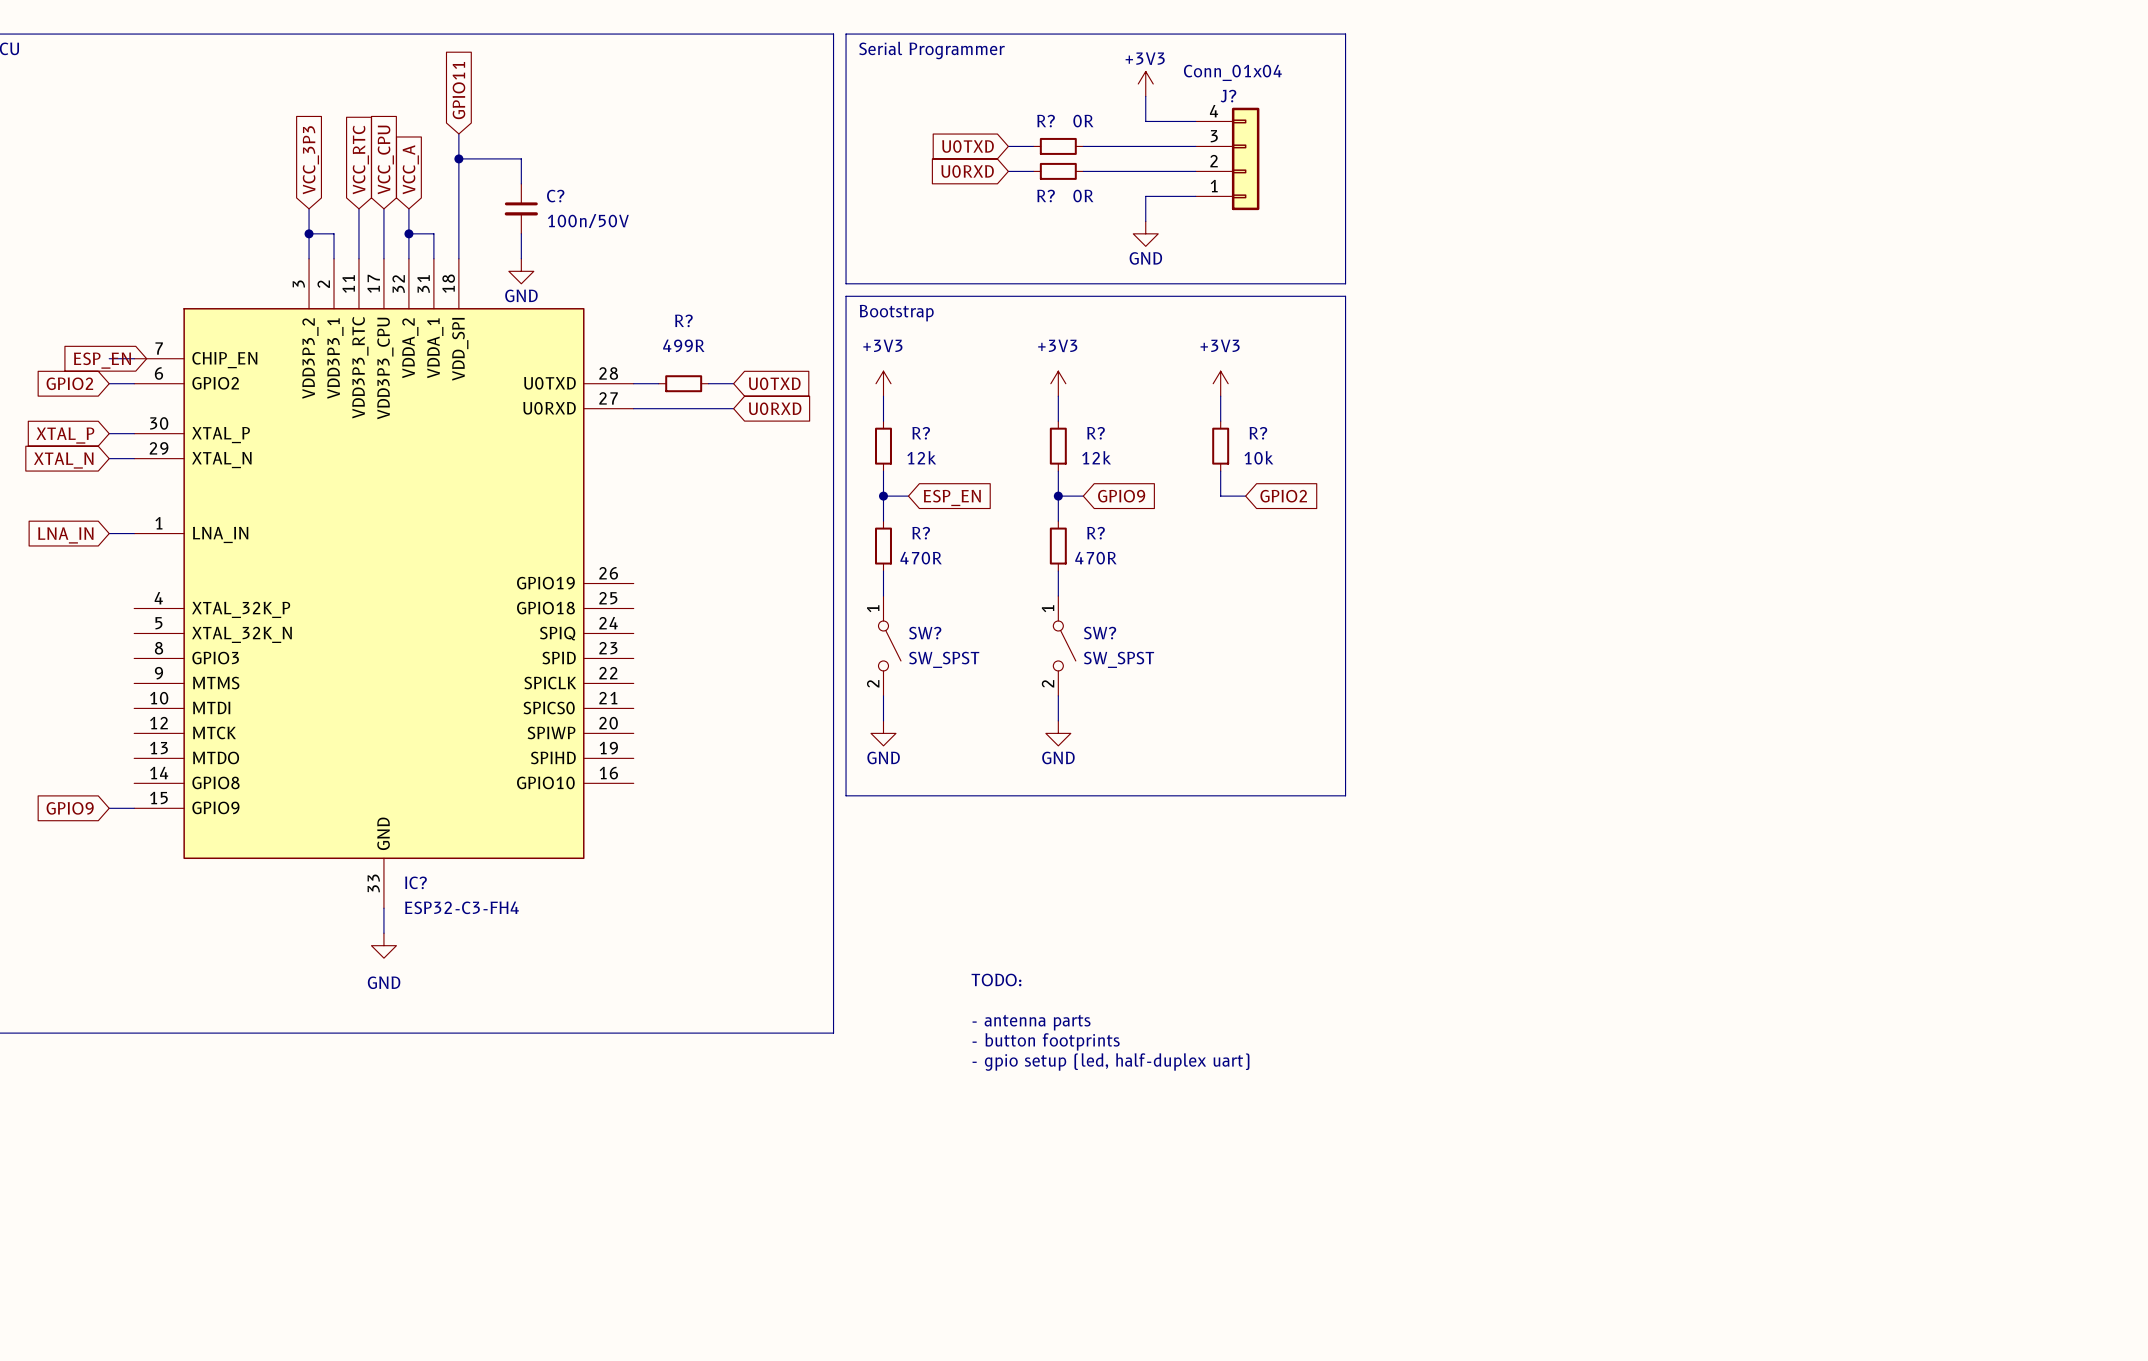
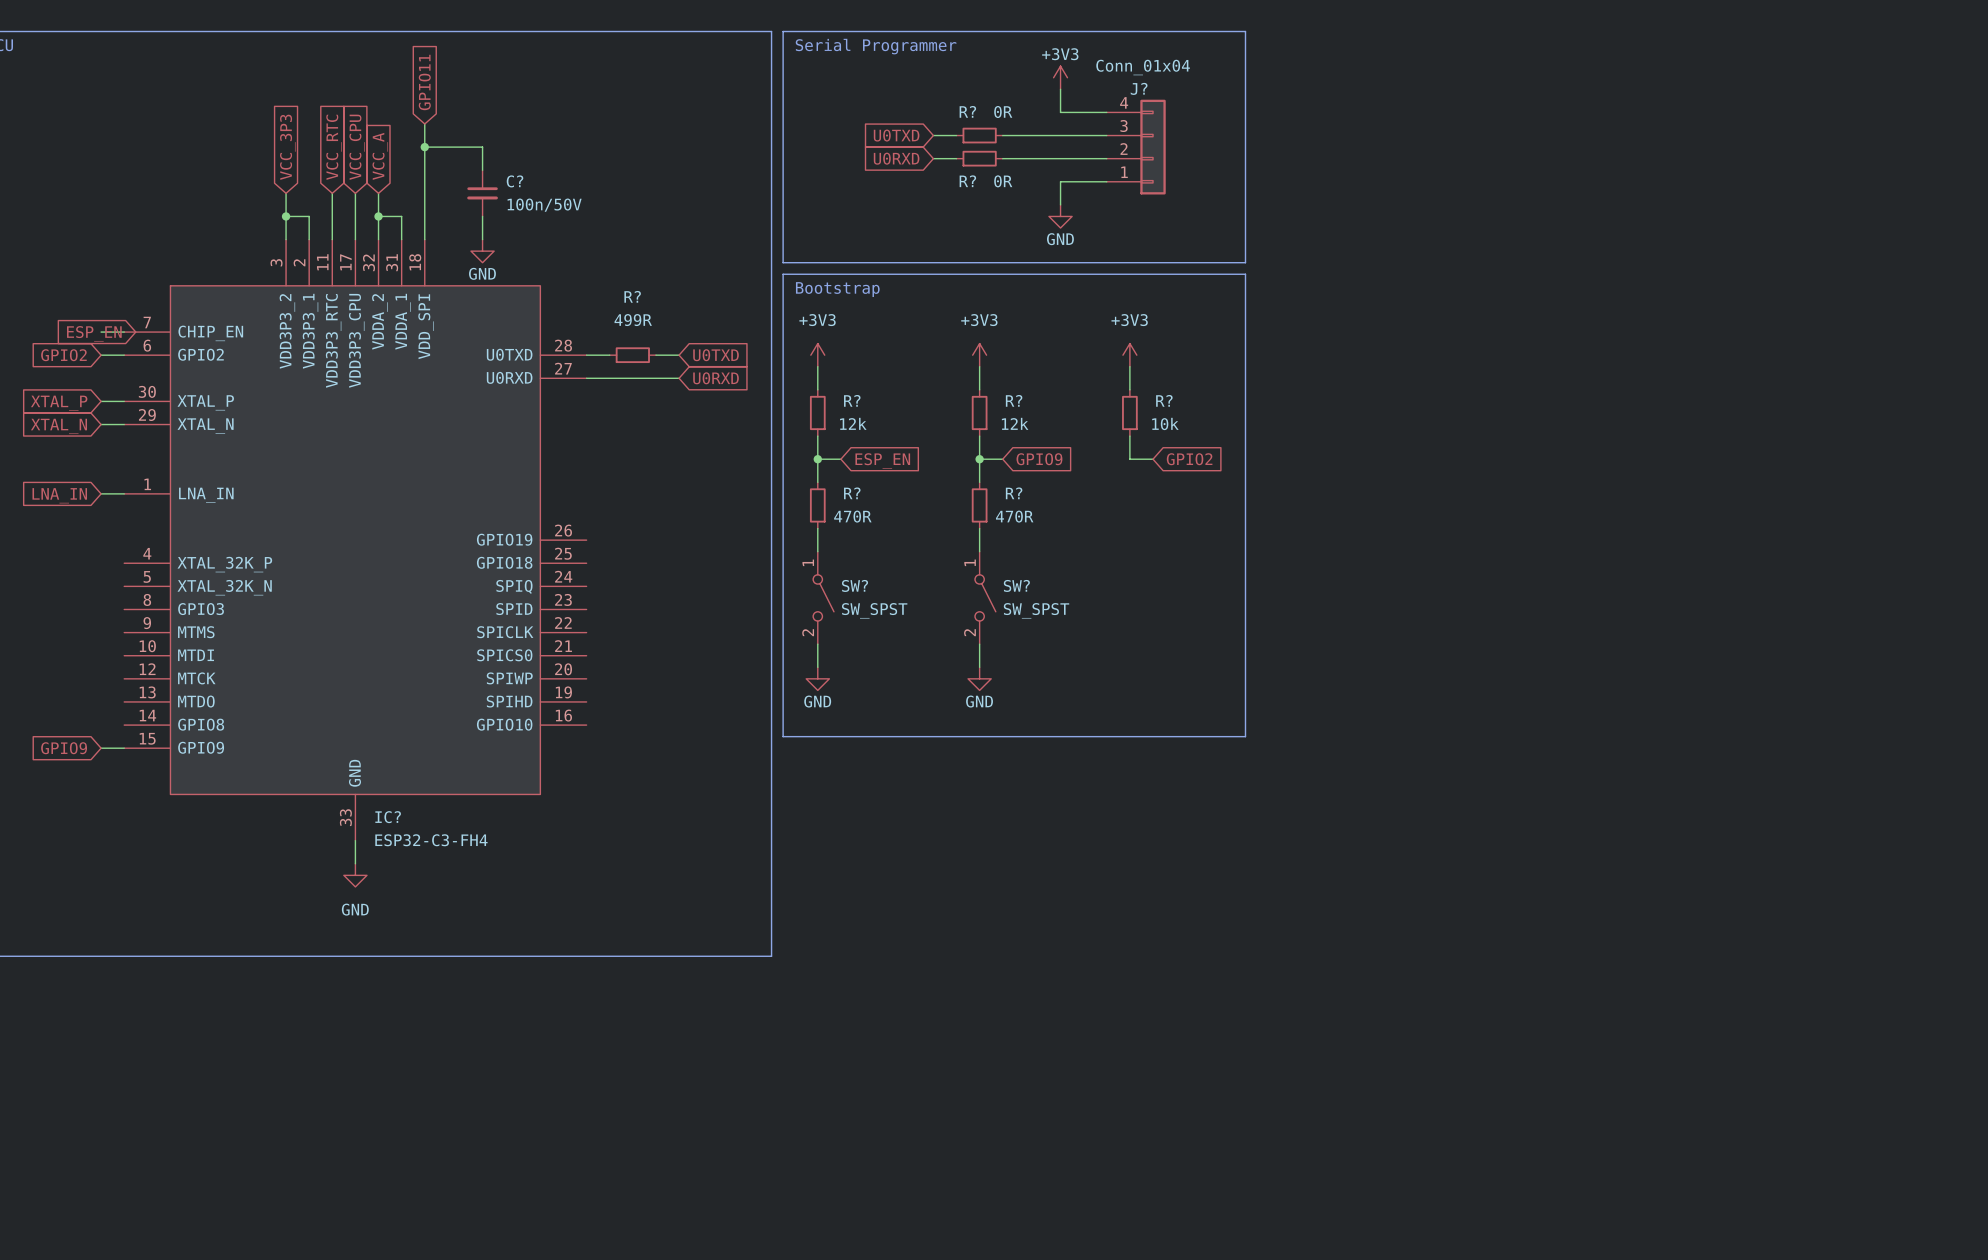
text: TODO: (996, 979) -> none
text: - antenna parts (1031, 1022) -> none
text: - button footprints (1046, 1041) -> none
text: - gpio setup (led, half-duplex uart) (1110, 1062) -> none

